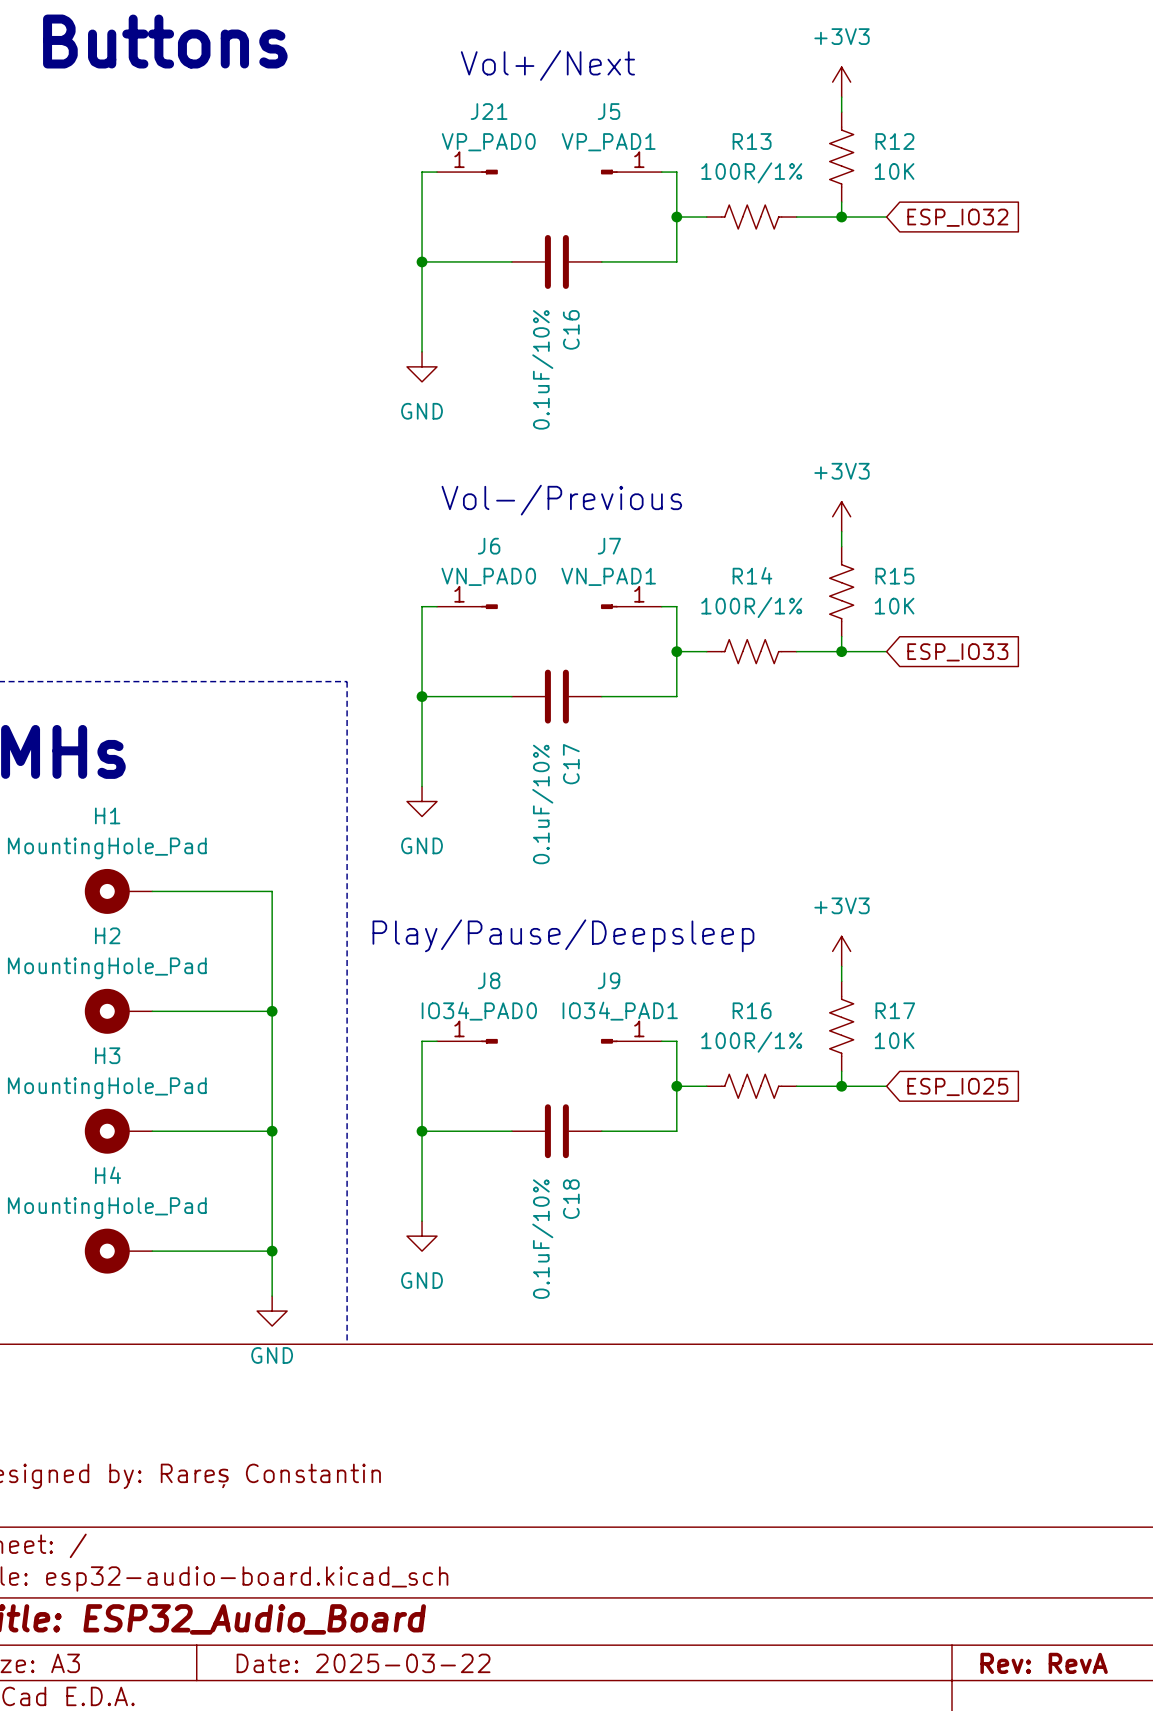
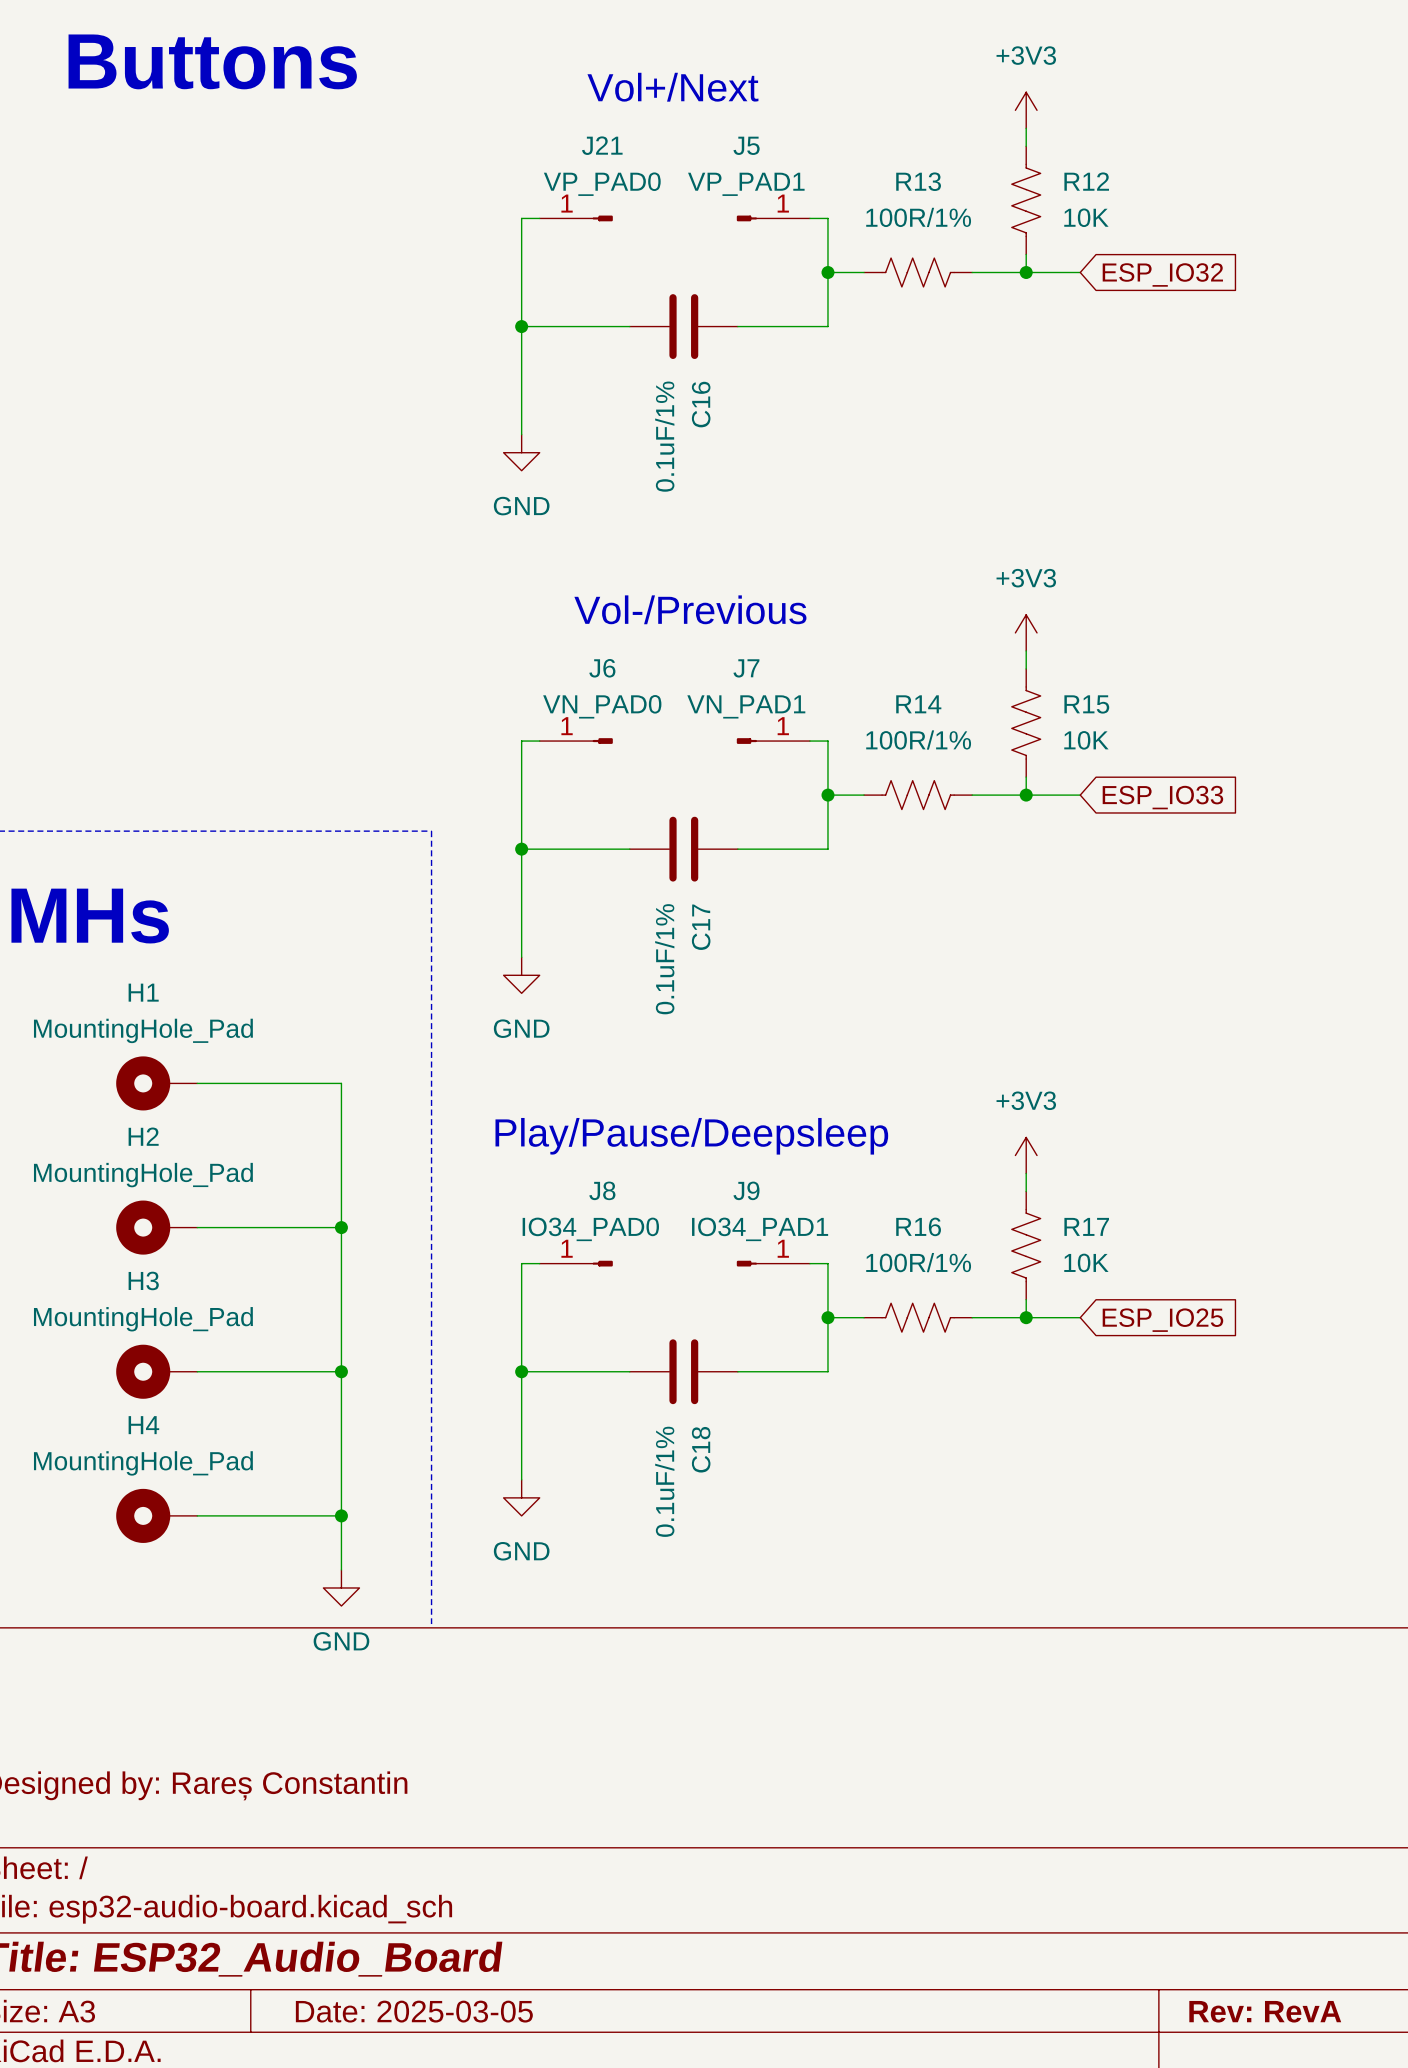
C16 value: 0.1uF/10% (542, 369) -> 0.1uF/1% (664, 436)
C17 value: 0.1uF/10% (542, 804) -> 0.1uF/1% (664, 959)
C18 value: 0.1uF/10% (542, 1239) -> 0.1uF/1% (664, 1481)
title block: Date: 2025-03-22 (363, 1663) -> Date: 2025-03-05 (414, 2011)

